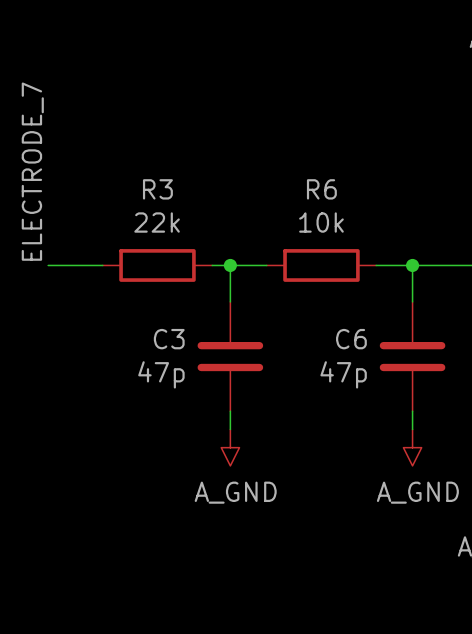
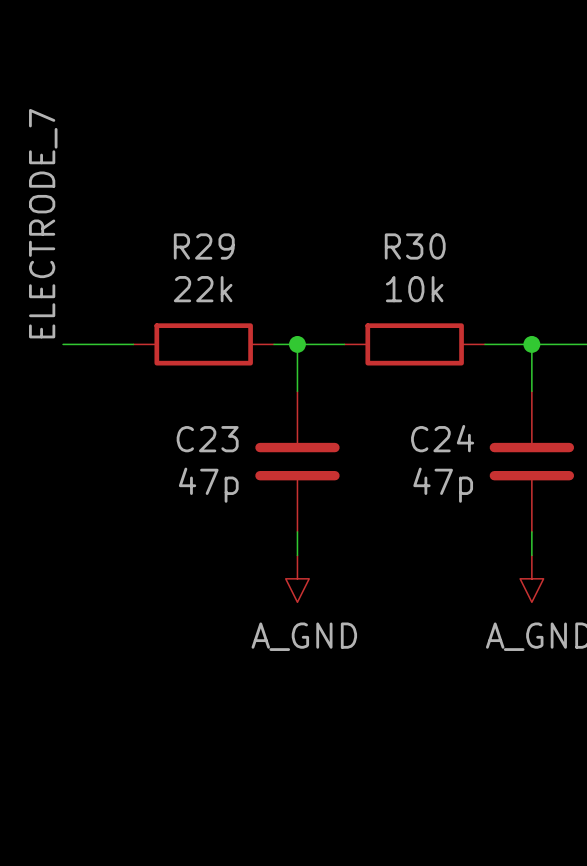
R3 name: R3 (157, 189) -> R29 (204, 246)
R6 name: R6 (321, 189) -> R30 (415, 246)
C3 name: C3 (169, 339) -> C23 (207, 439)
C6 name: C6 (351, 339) -> C24 (442, 438)

